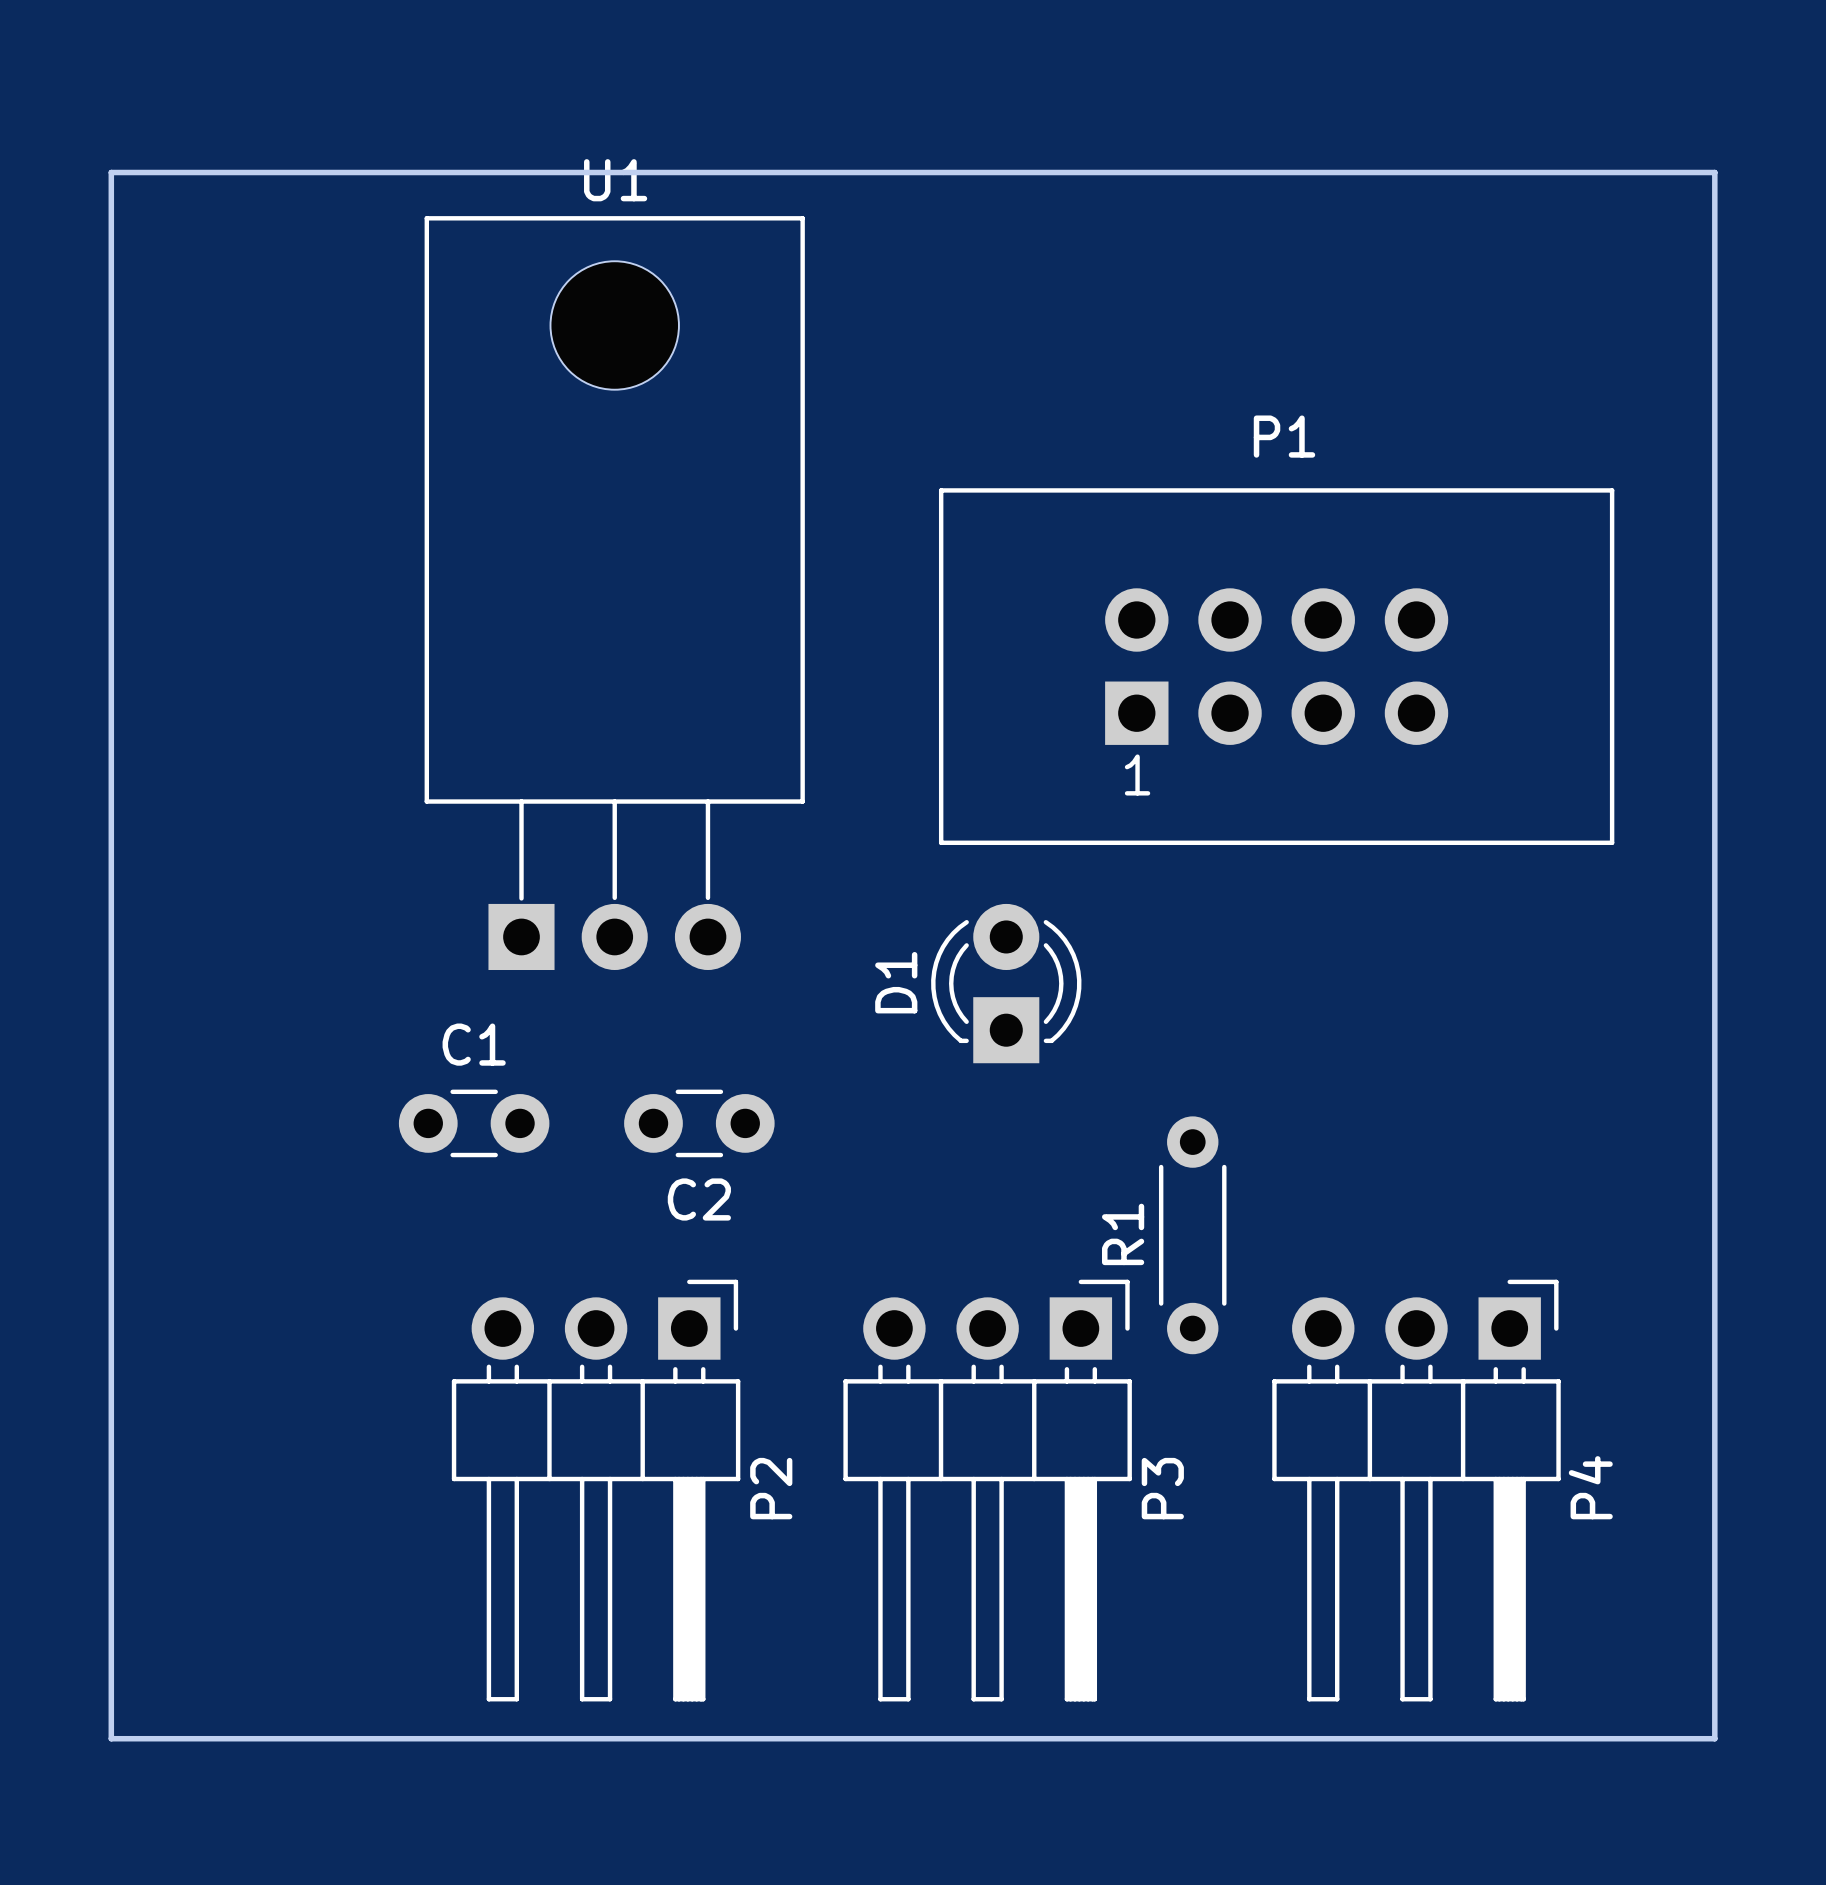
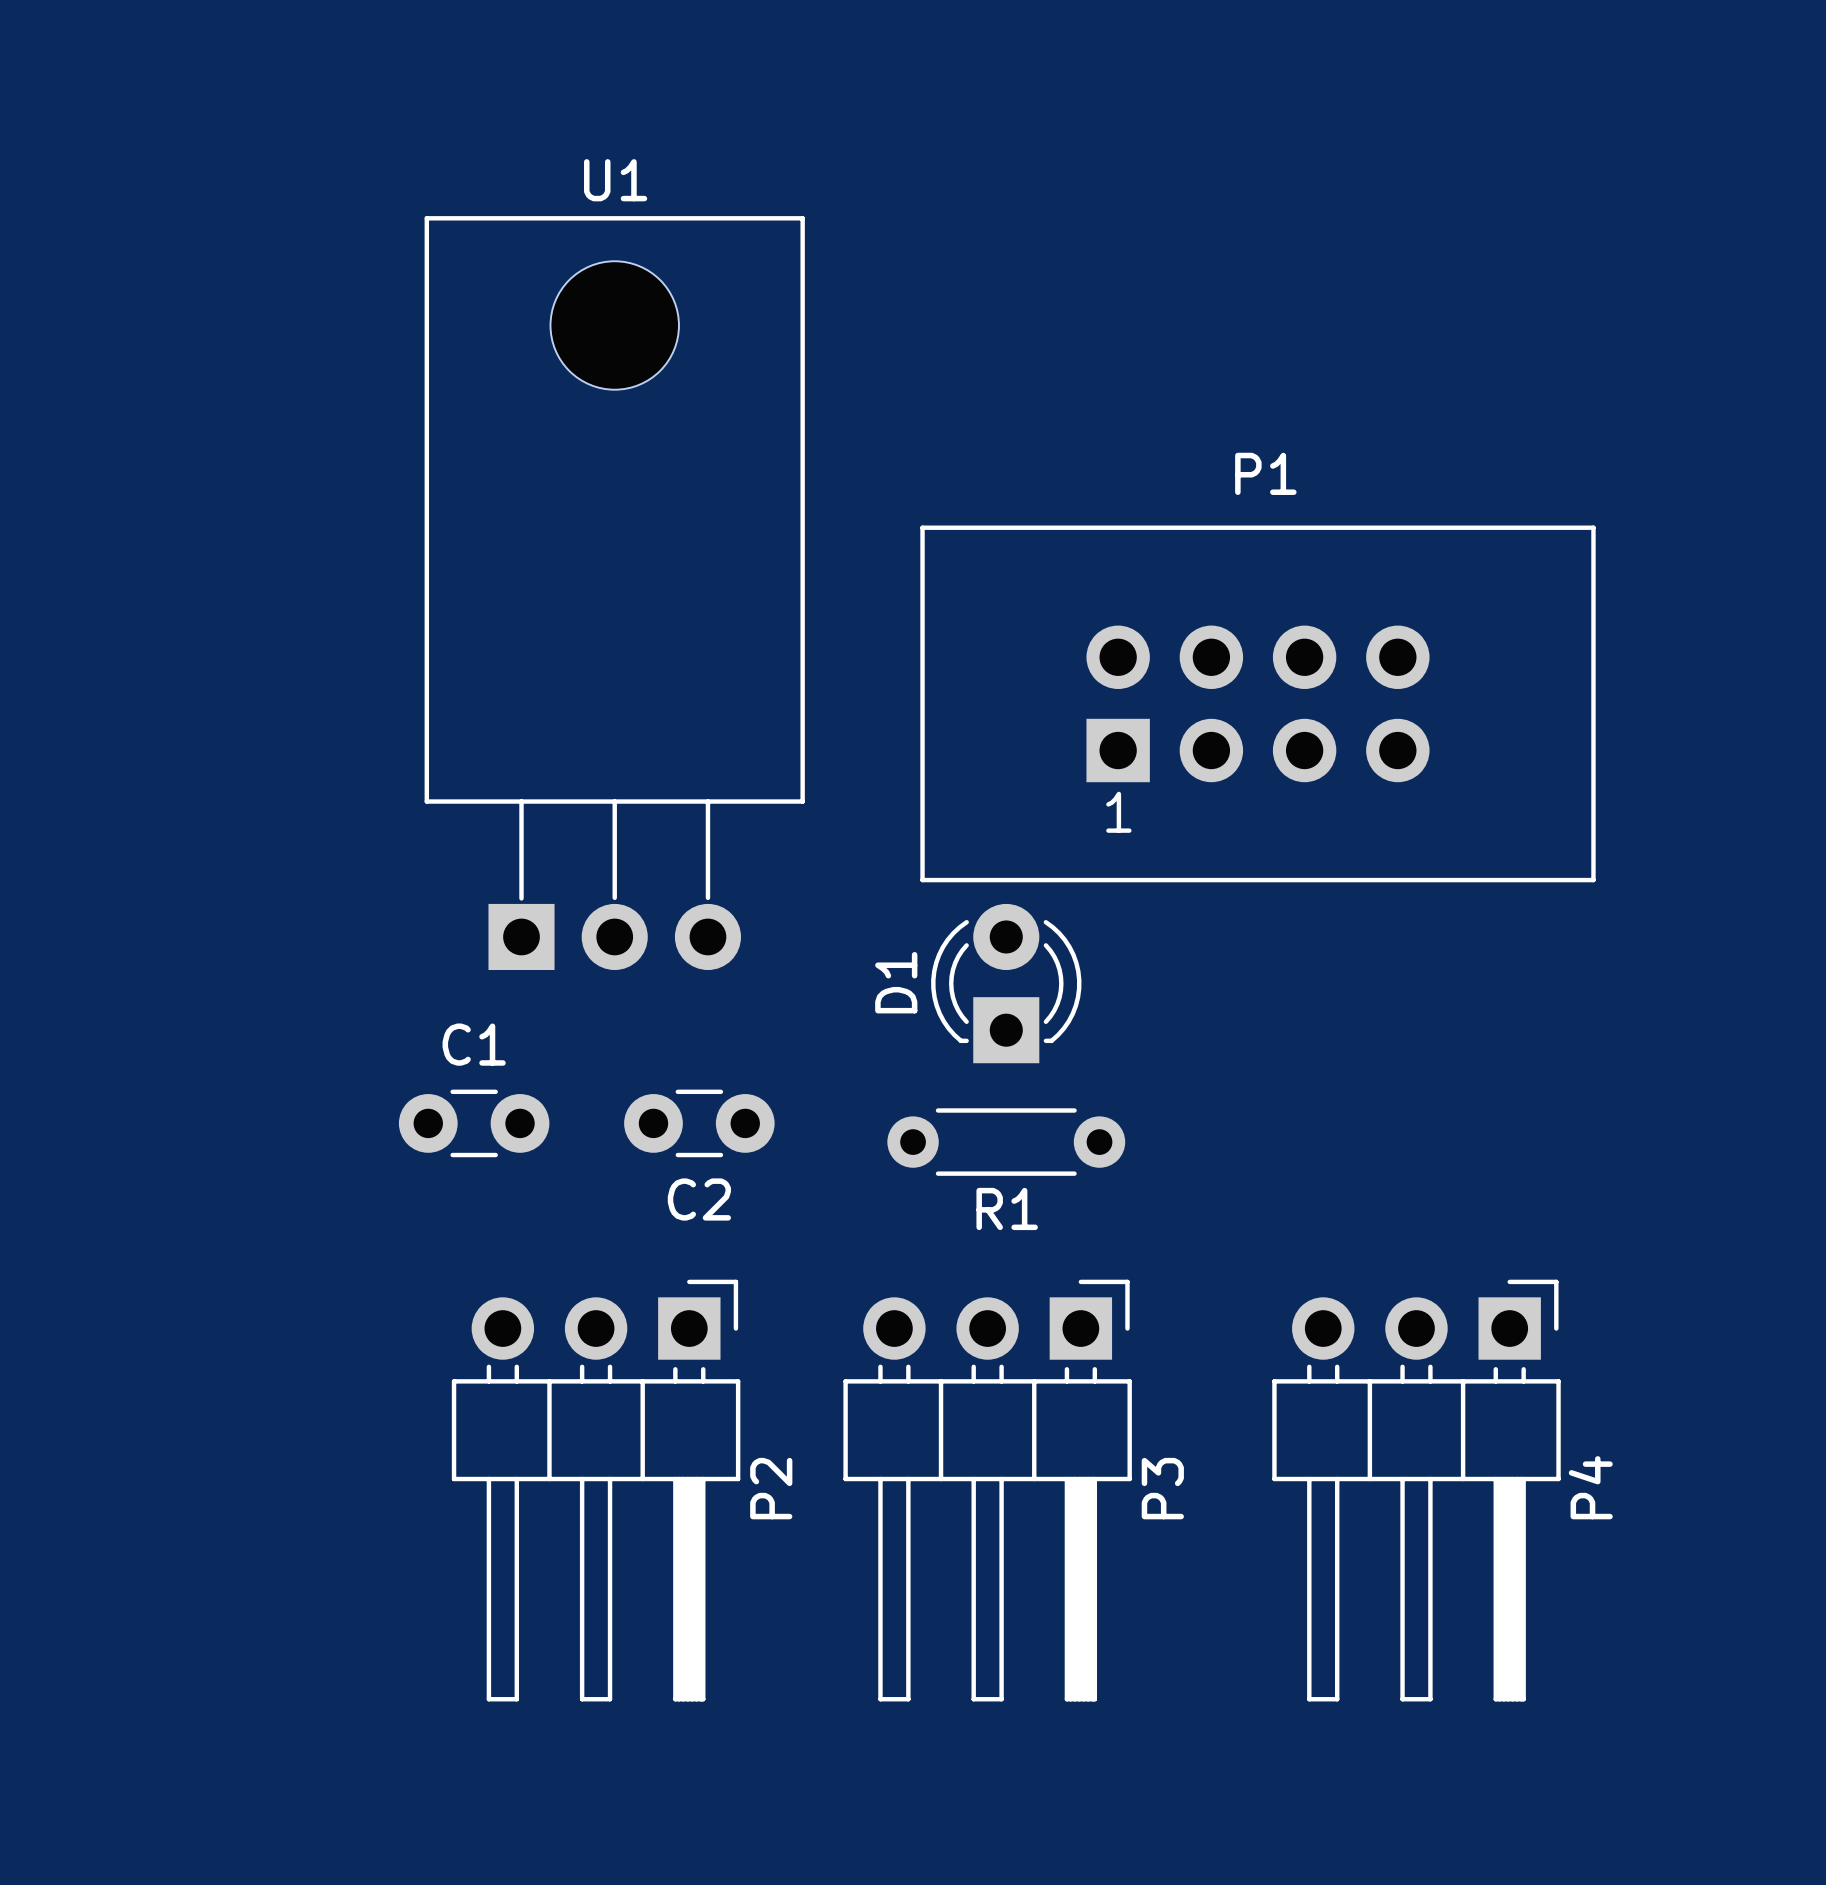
board edge: (111, 172) (111, 1738) (1714, 1738) (1714, 172) (111, 172) -> none
P1 position: (1276, 666) -> (1258, 703)
R1 name position: R1 (1123, 1234) -> R1 (1007, 1208)
R1 rotation: 0° (1192, 1235) -> 90° clockwise (1006, 1142)
R1 position: (1192, 1235) -> (1006, 1142)

